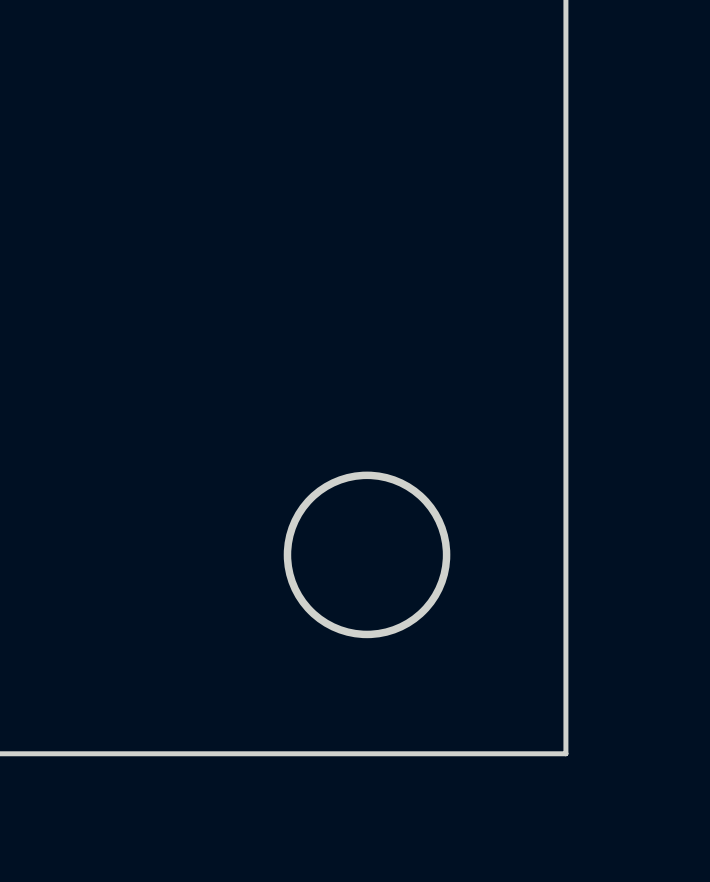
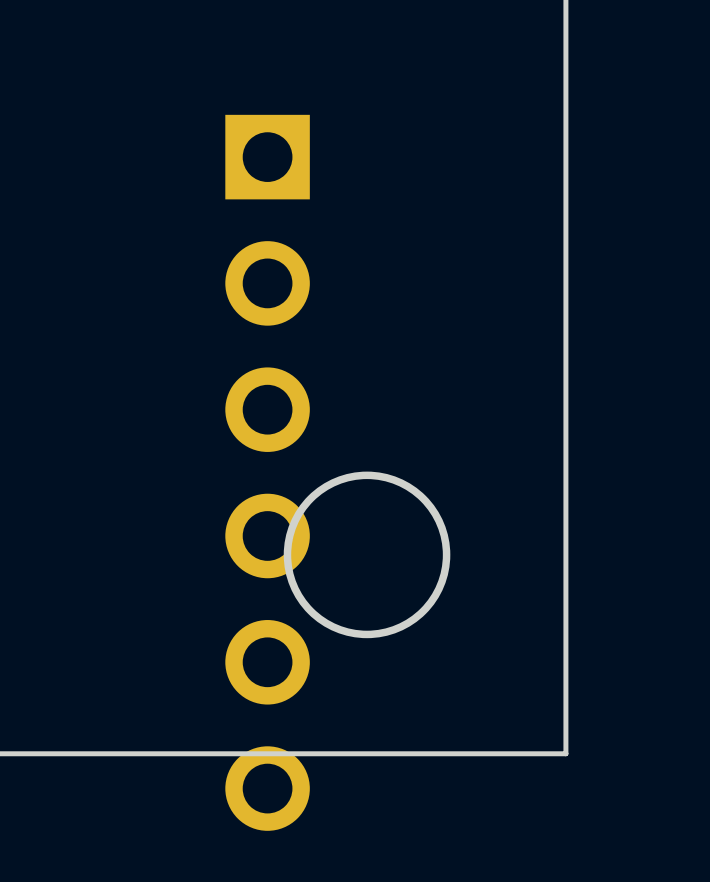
part: none -> (267, 472)

